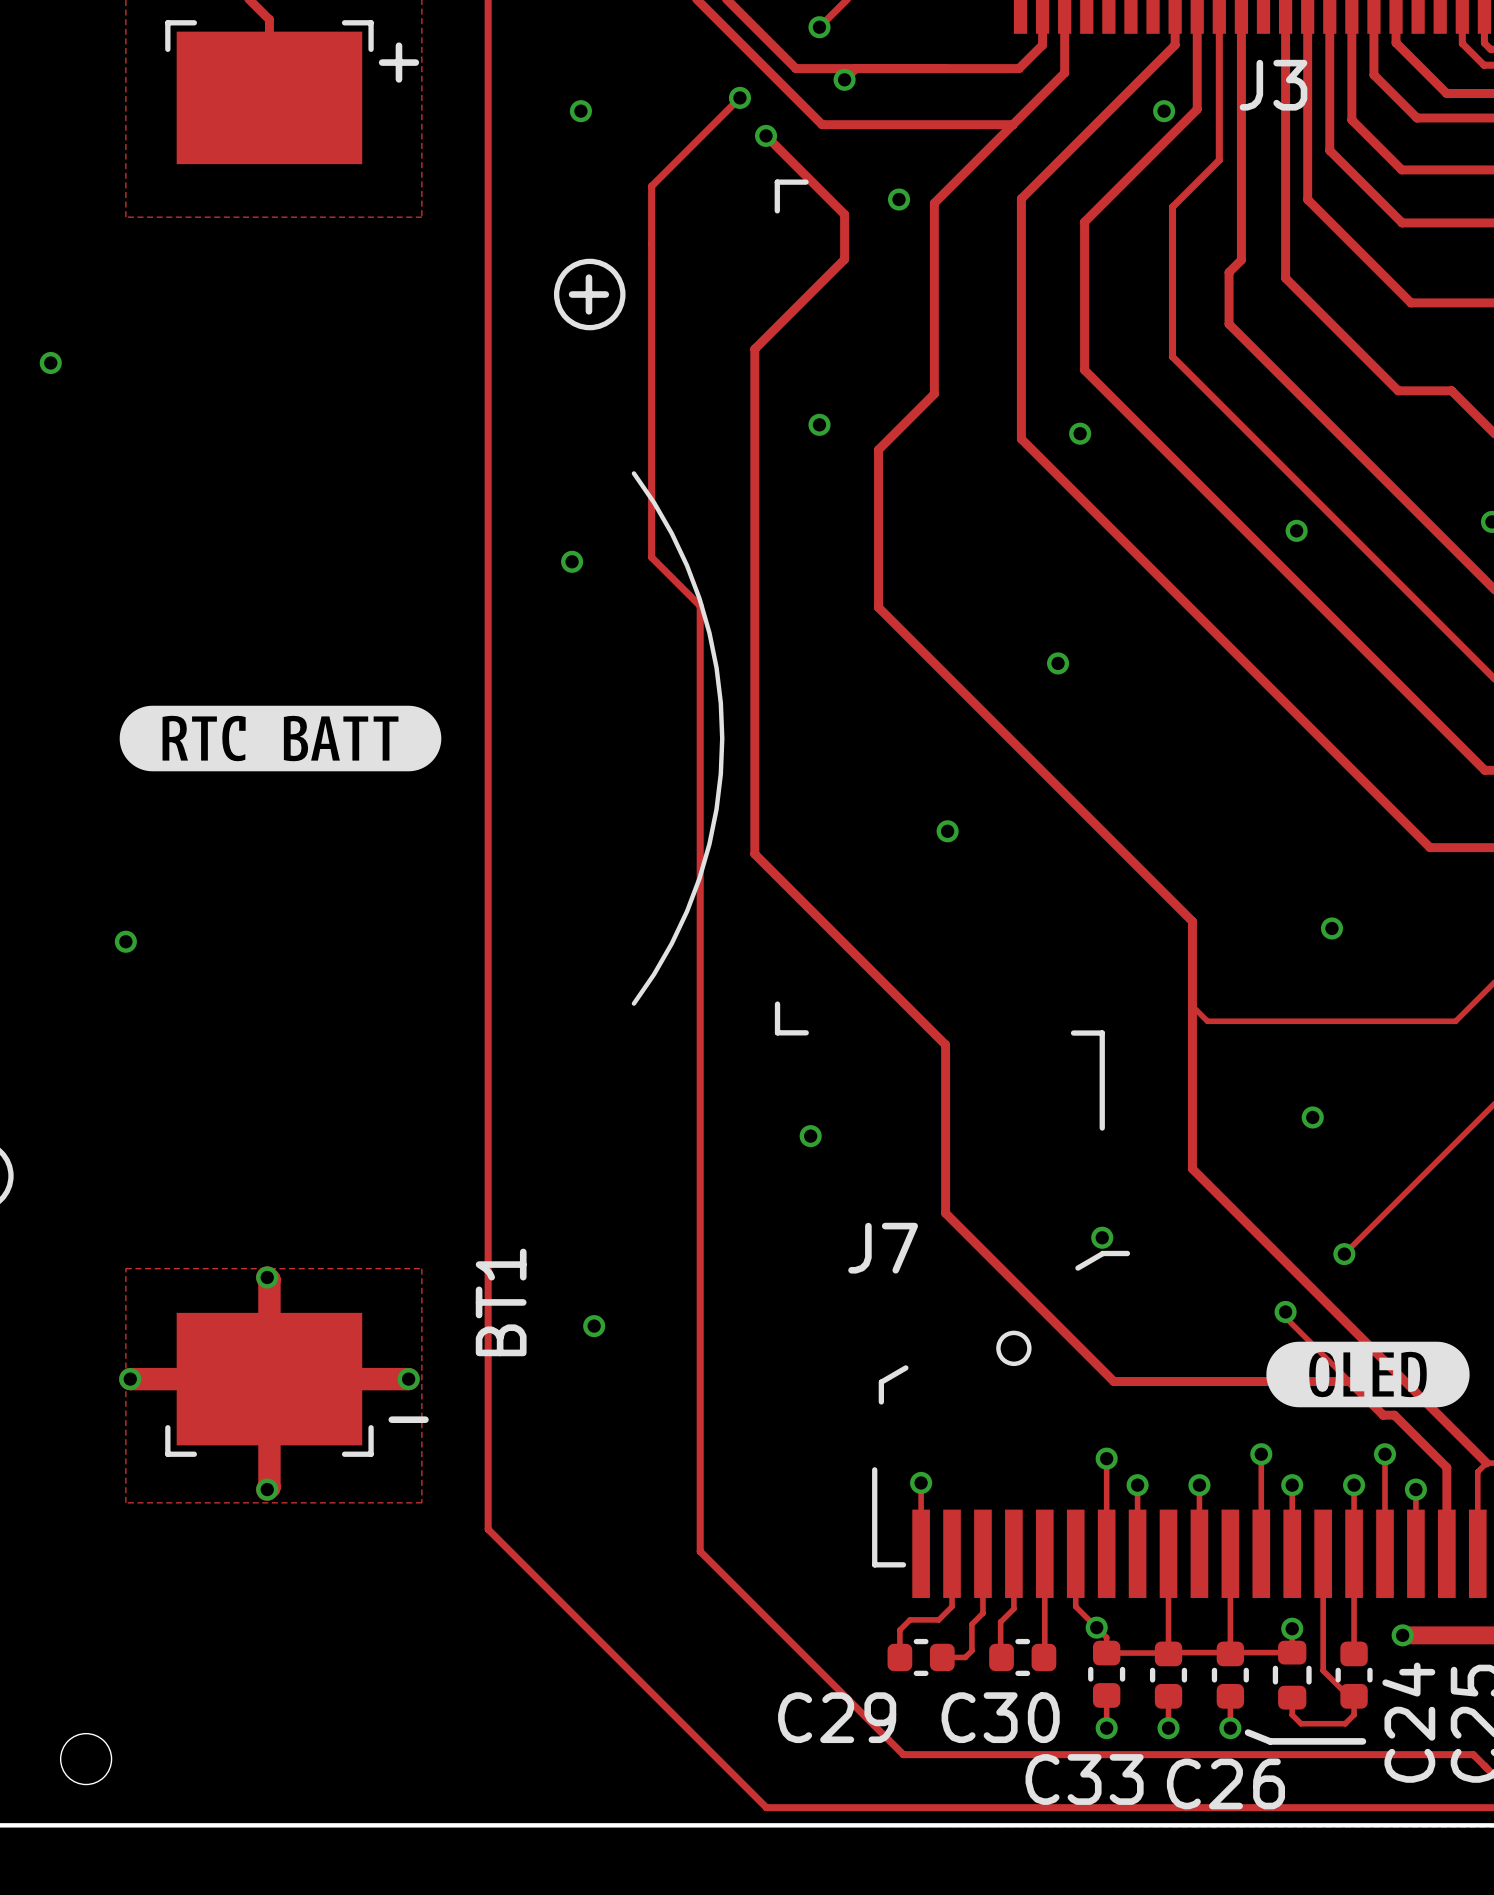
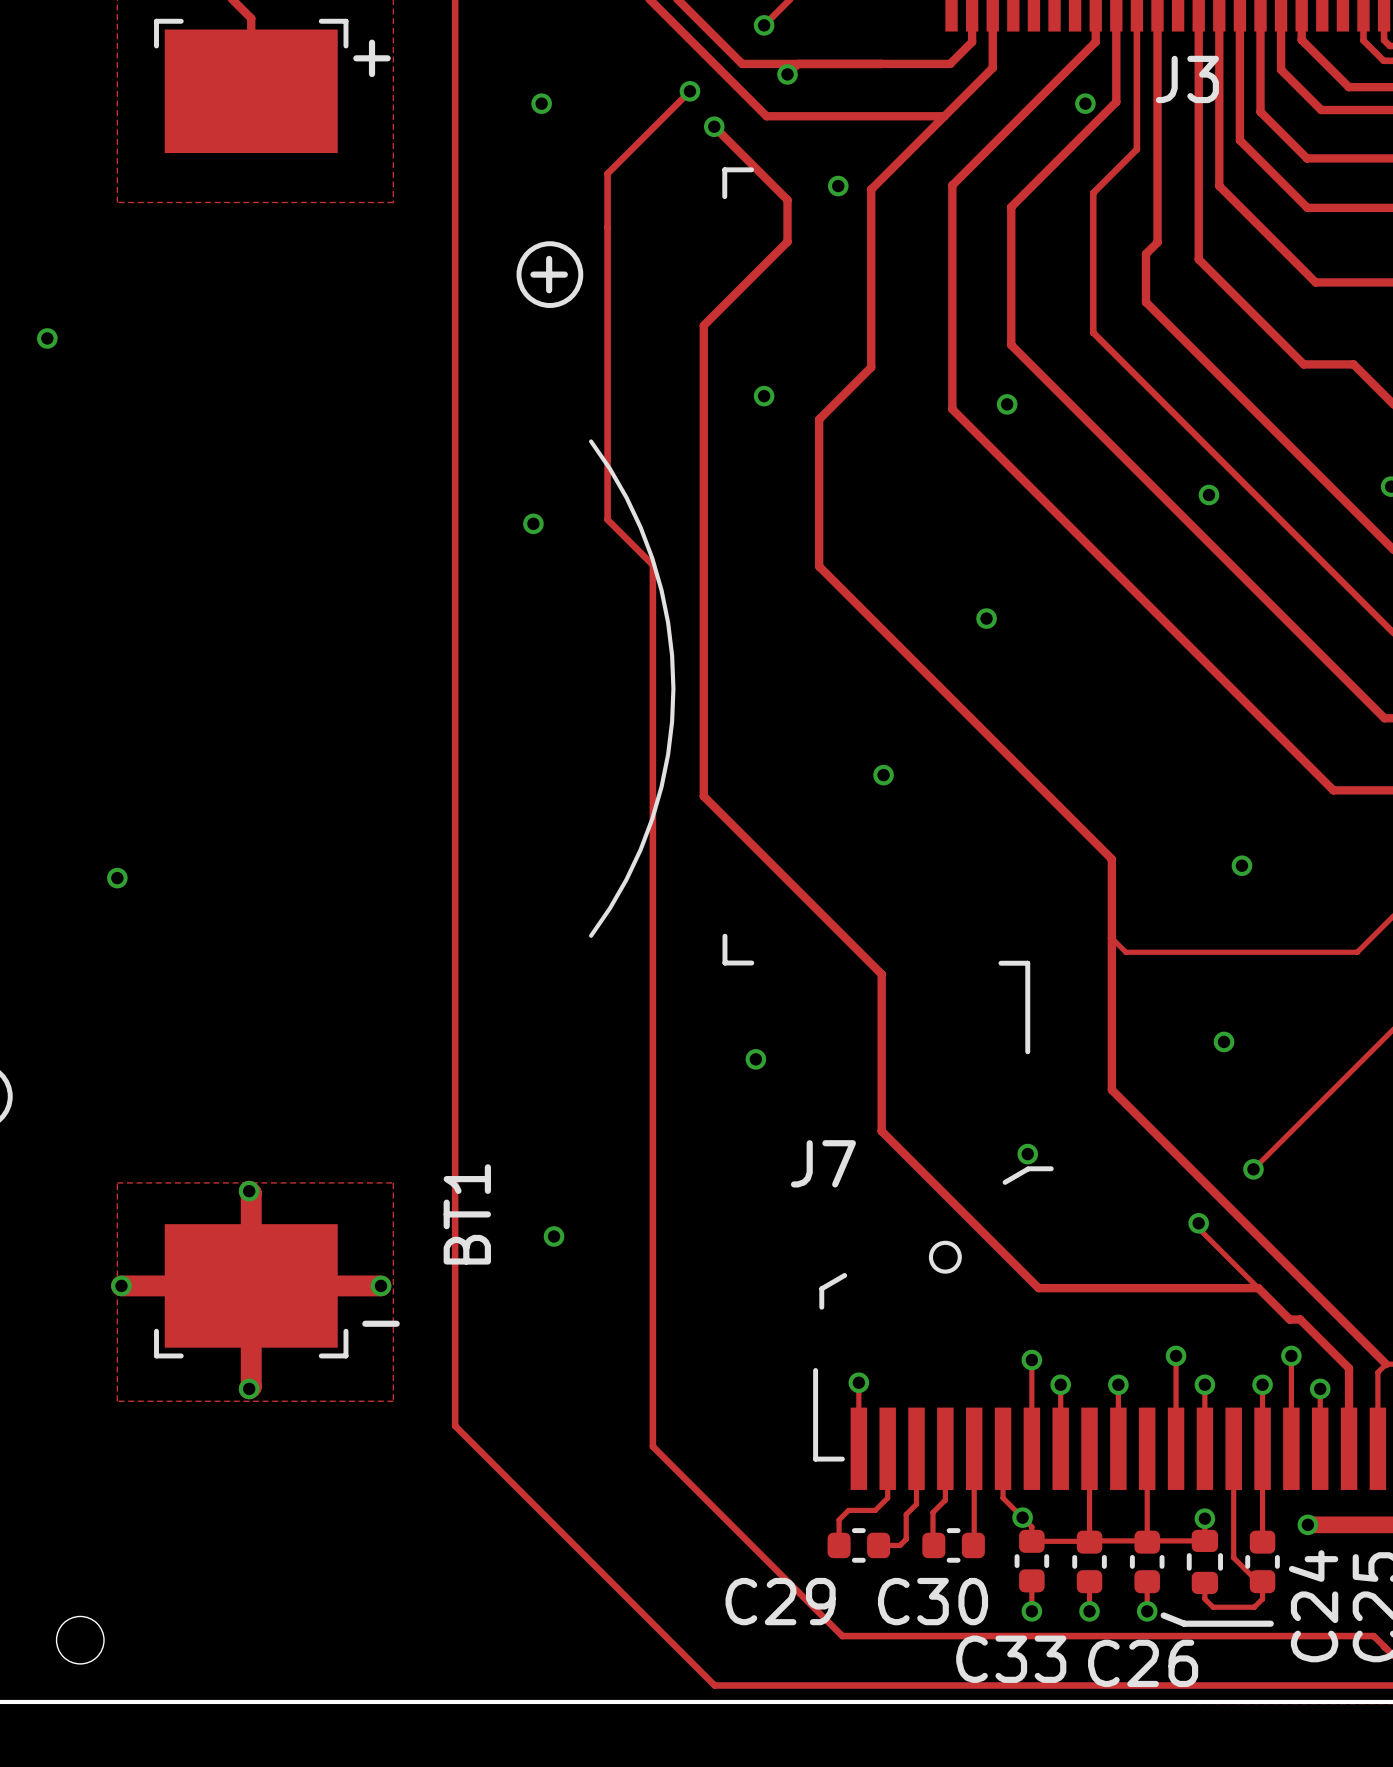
drawing: [119, 705, 442, 772] -> none
drawing: [1266, 1341, 1470, 1408] -> none

